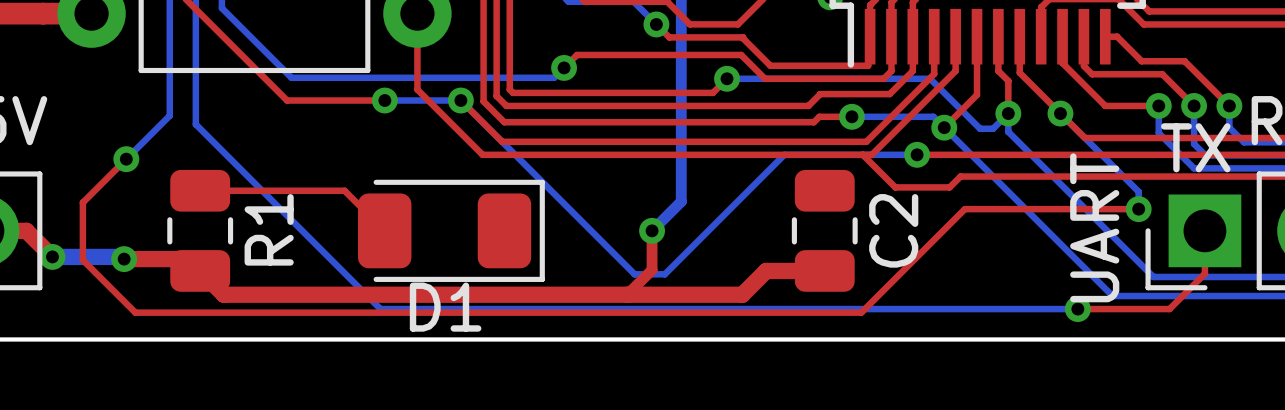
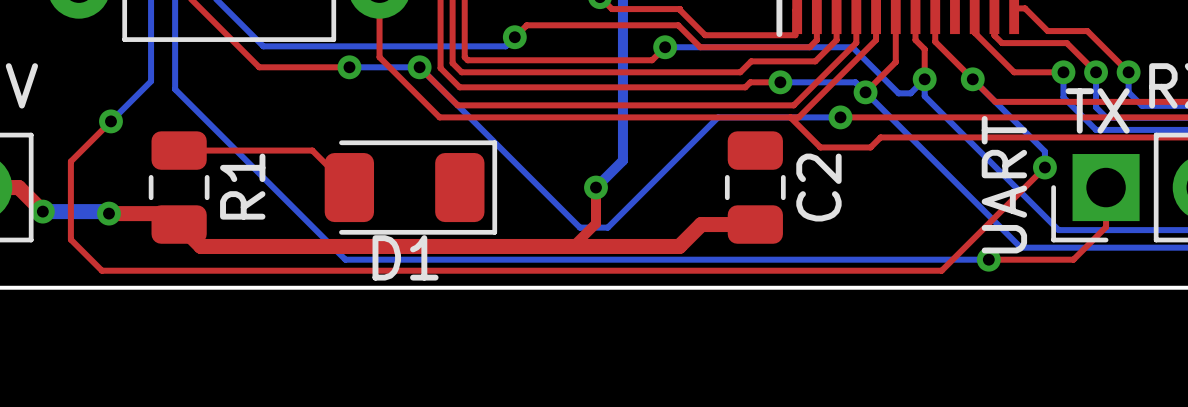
top track: (1138, 209) (964, 209) (861, 312) (135, 312) (82, 260) -> (1044, 167) (941, 270) (101, 270) (70, 239) (70, 214)

